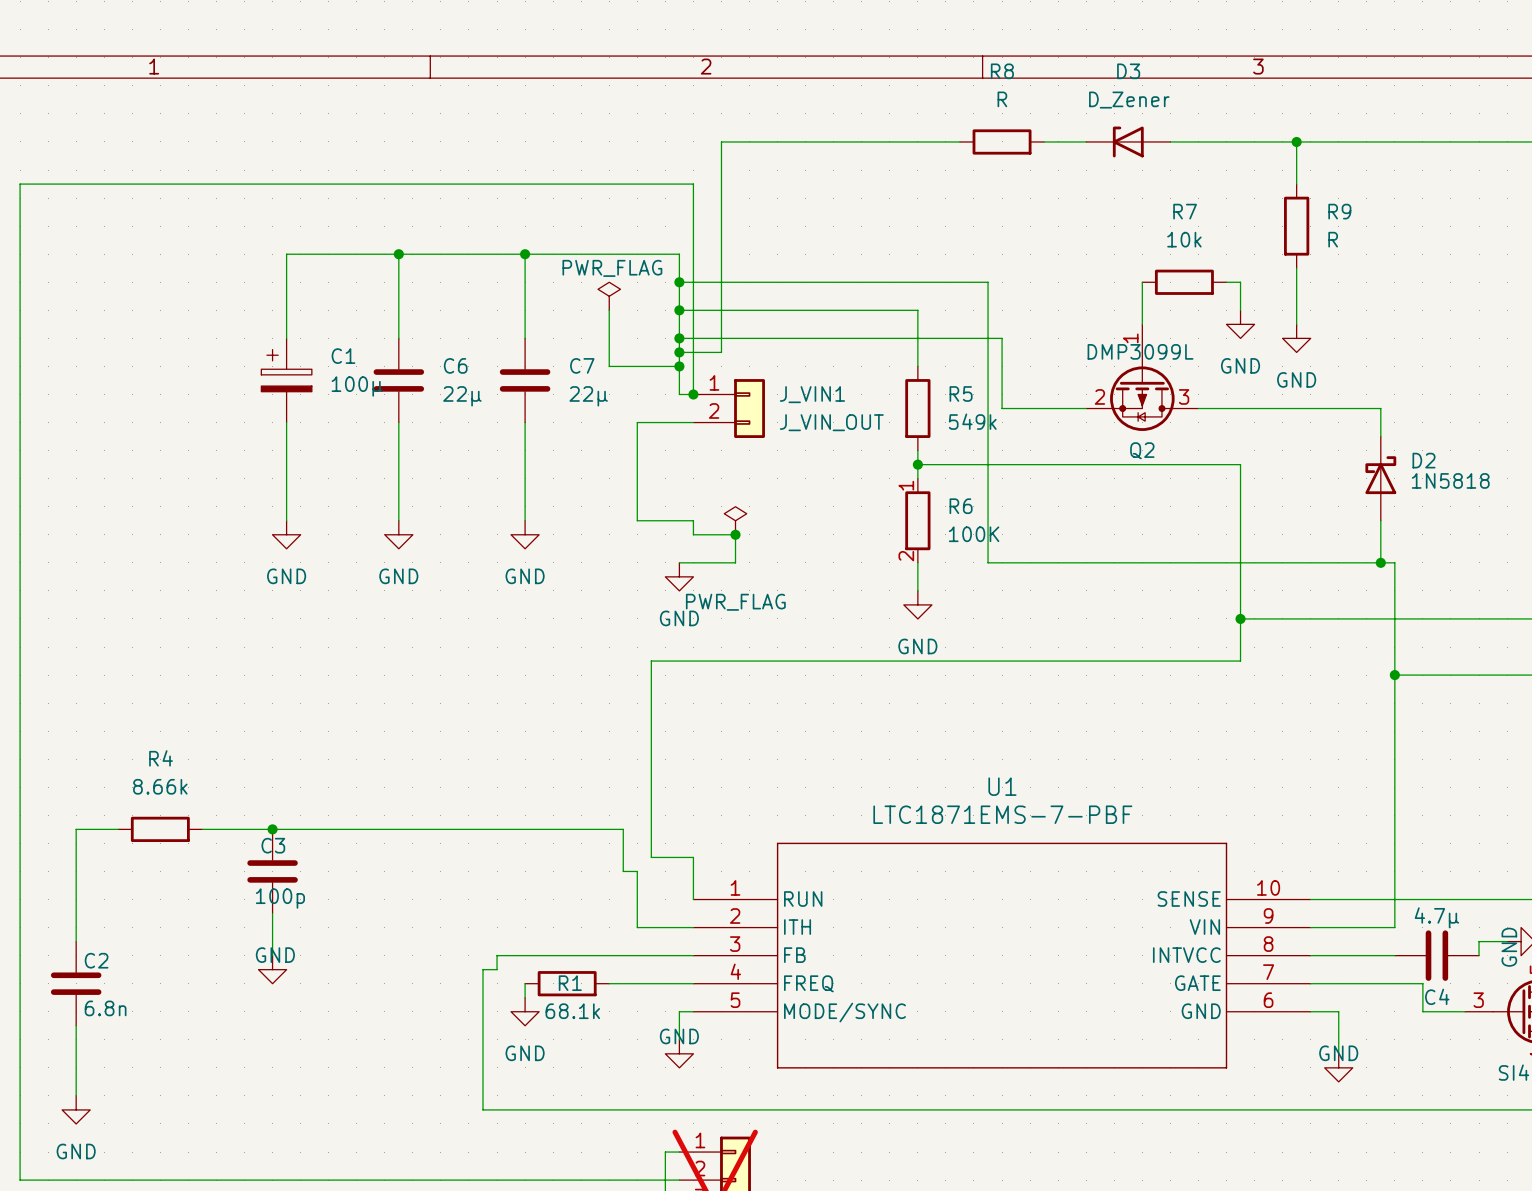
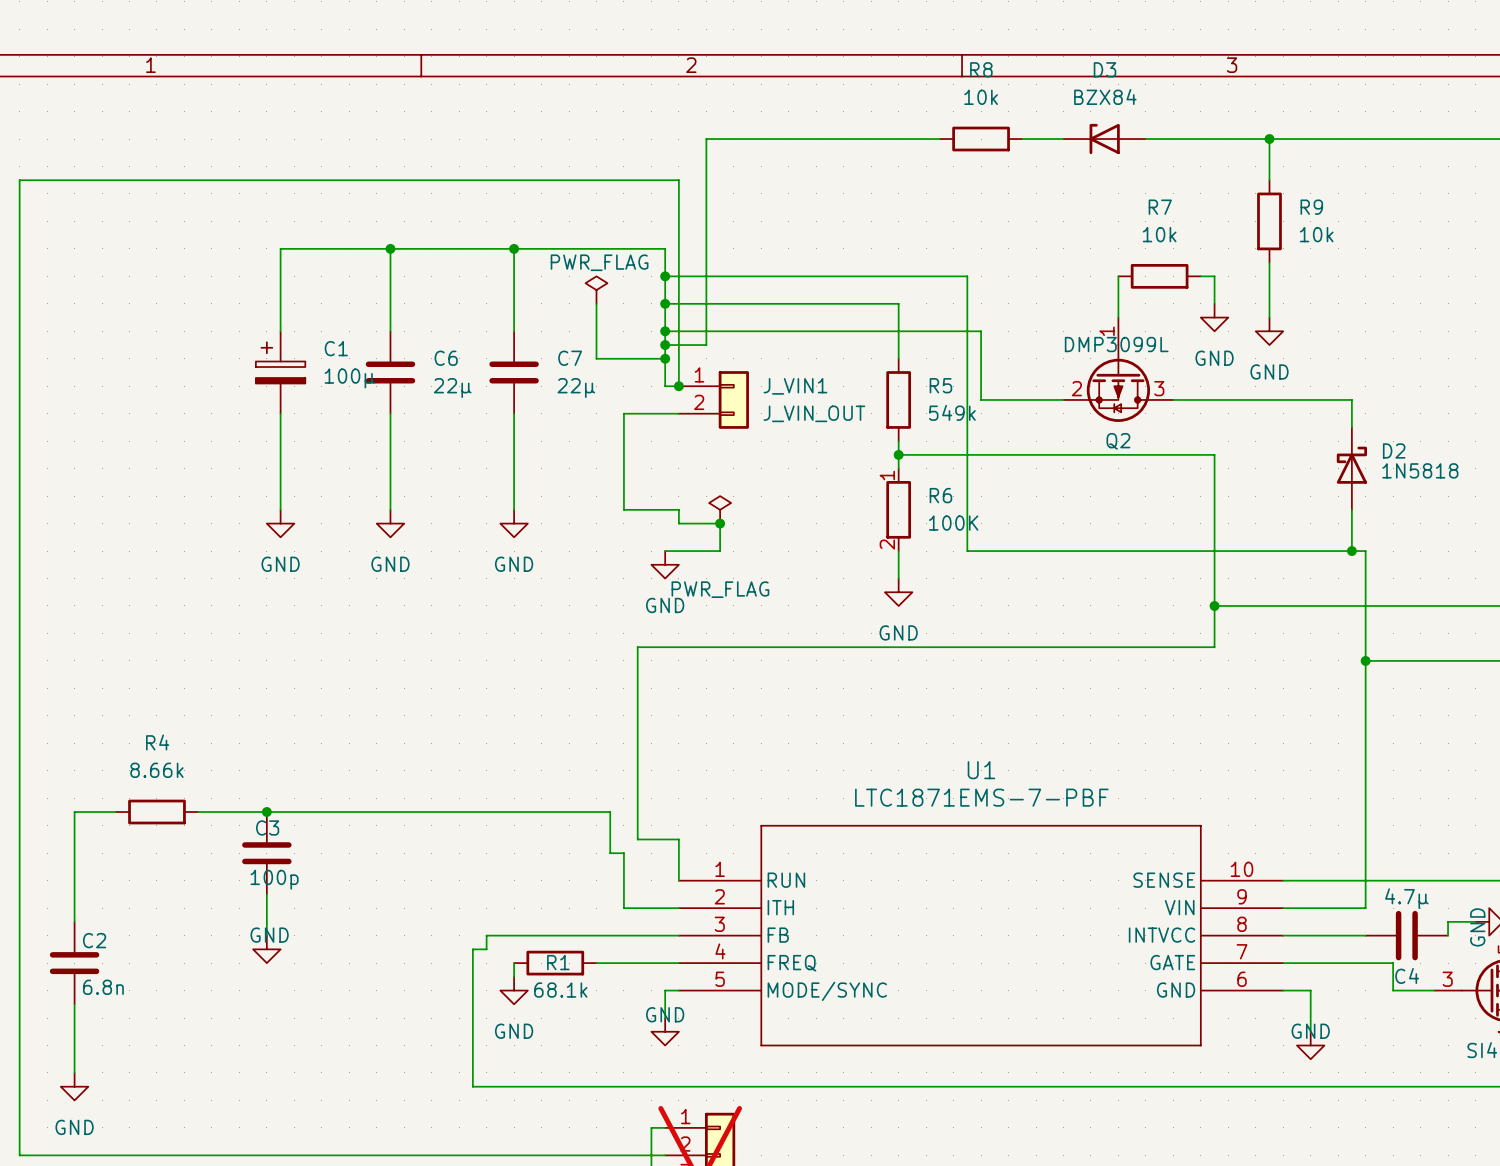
R8 value: R (1002, 99) -> 10k (981, 97)
D3 value: D_Zener (1129, 100) -> BZX84 (1105, 96)
R9 value: R (1333, 239) -> 10k (1316, 234)

